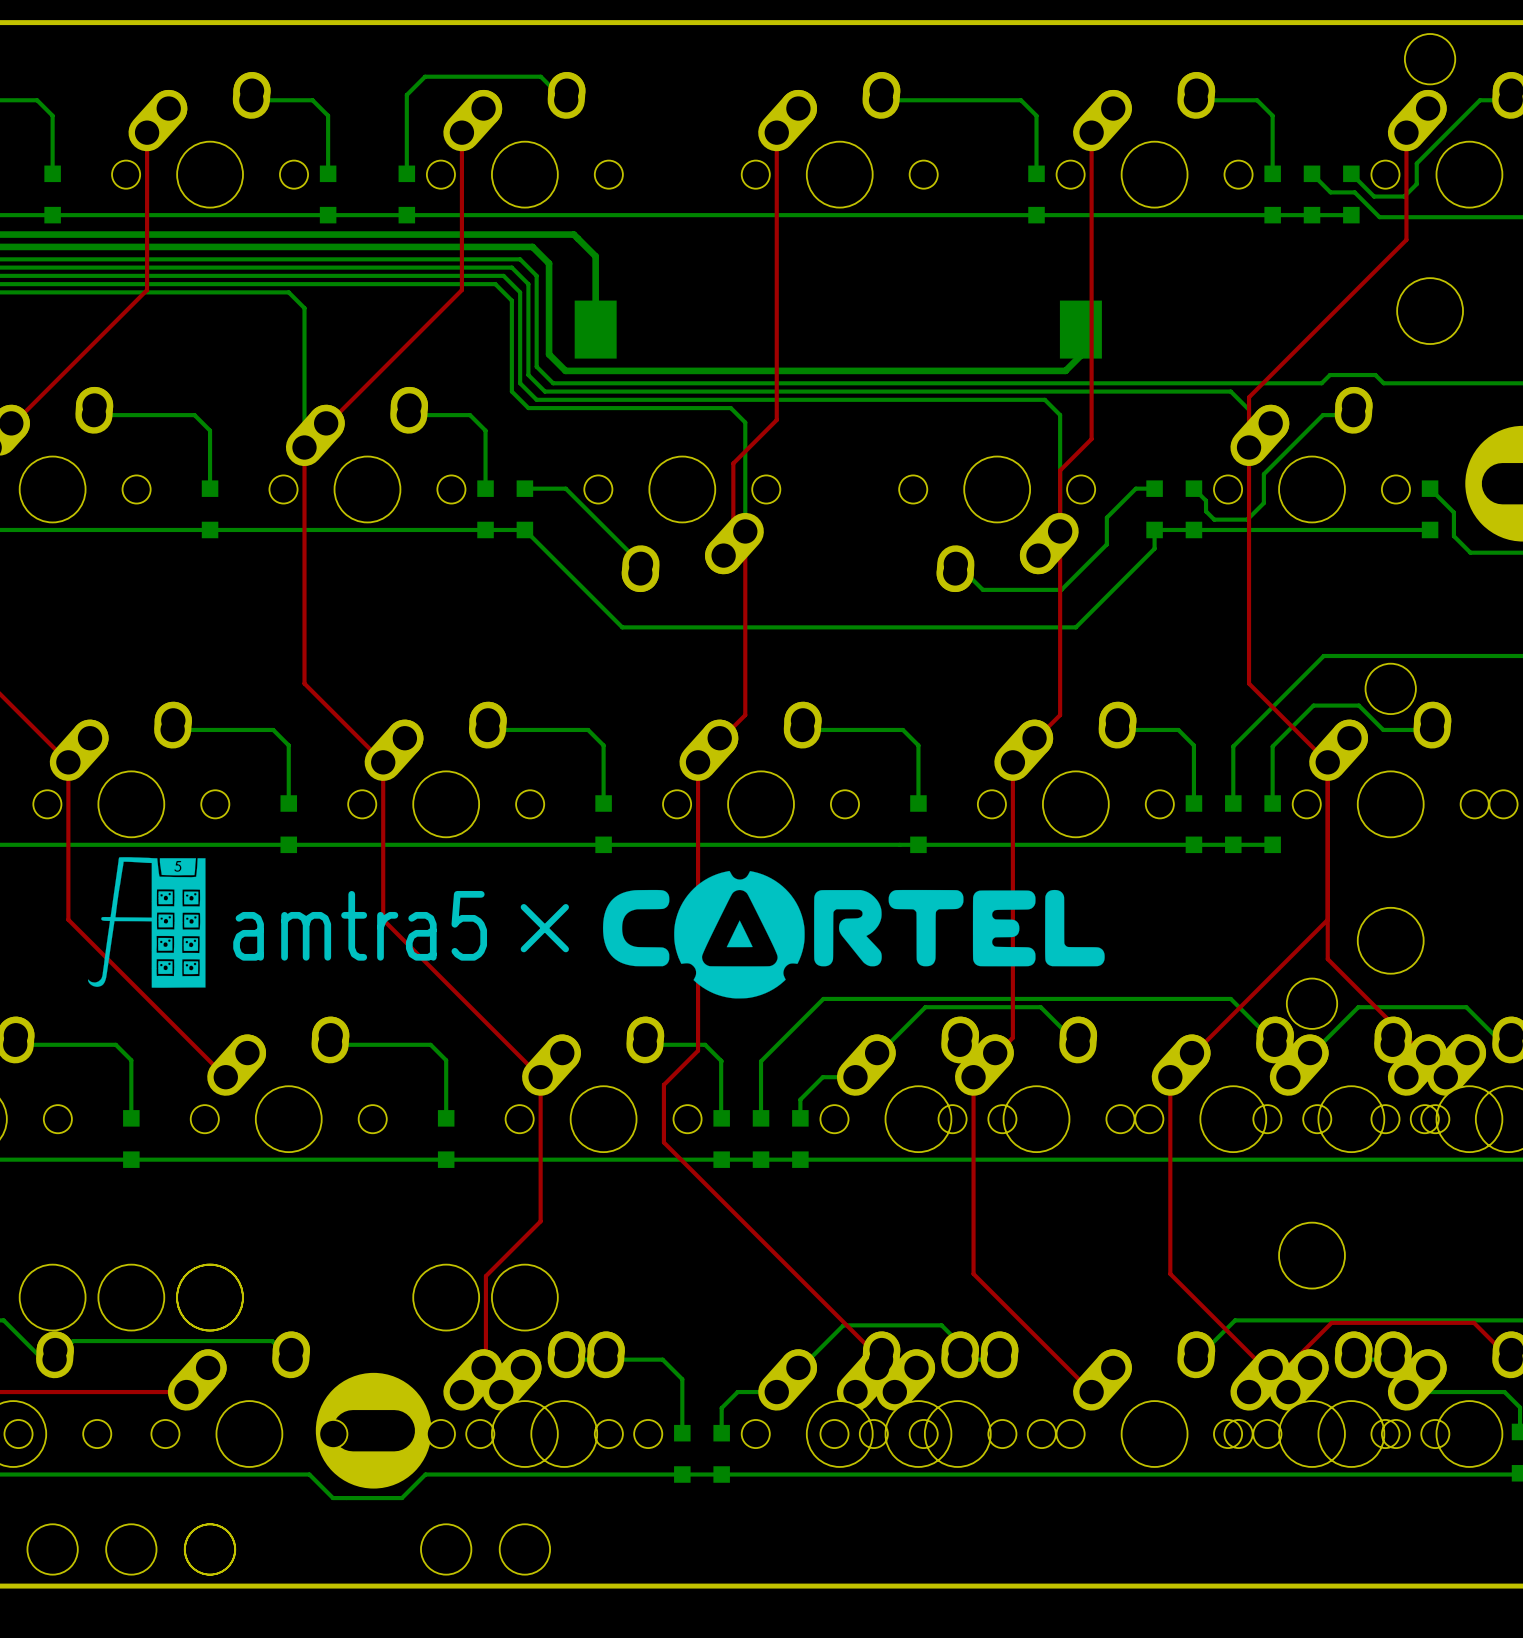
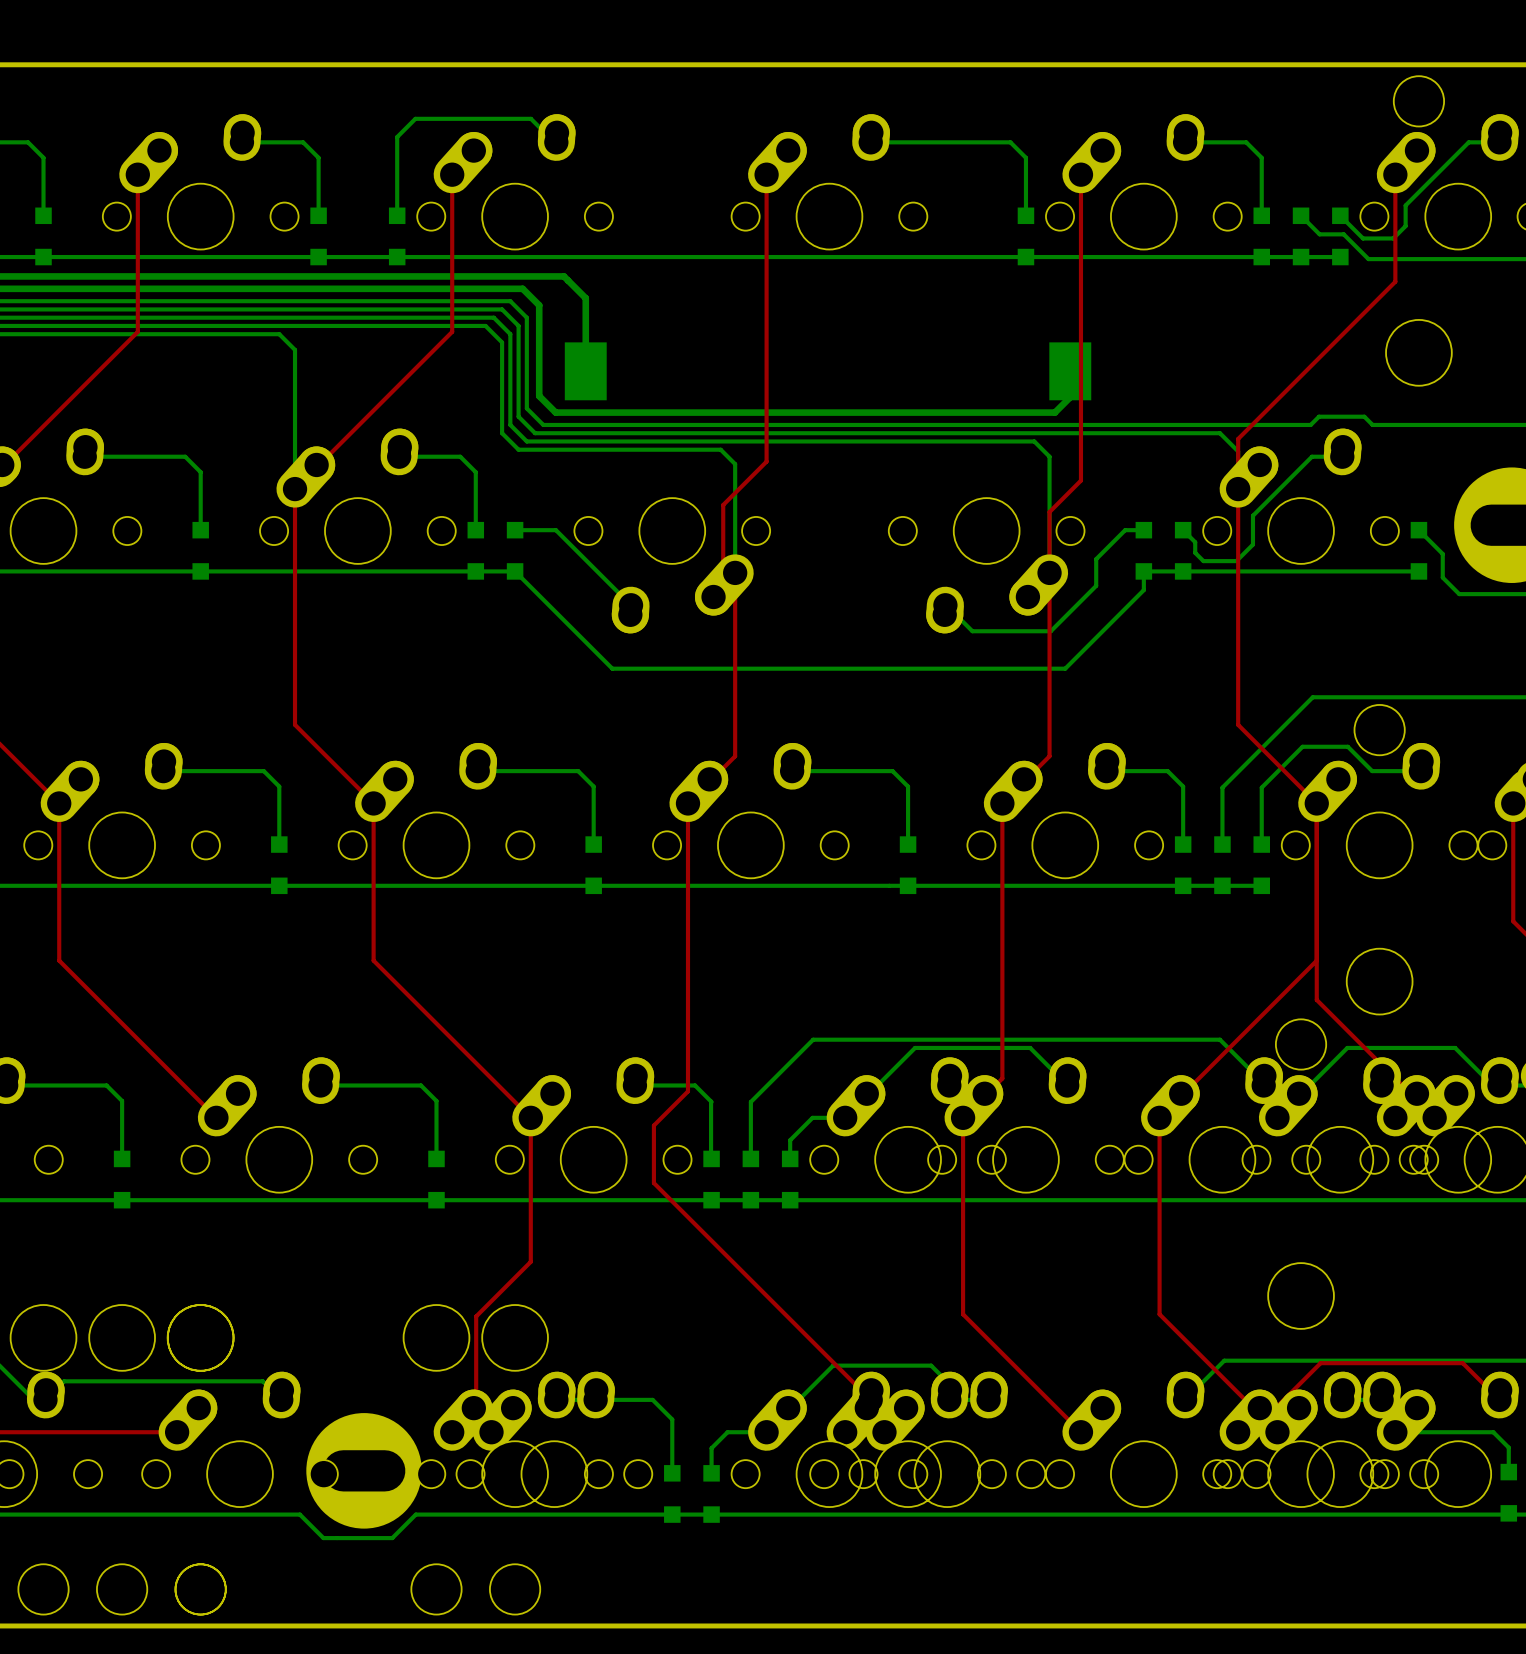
drawing: [88, 857, 206, 988] -> none
drawing: [602, 870, 1105, 999] -> none
line: (523, 907) (565, 949) -> none
line: (565, 907) (523, 949) -> none
text: amtra5 (360, 925) -> none

